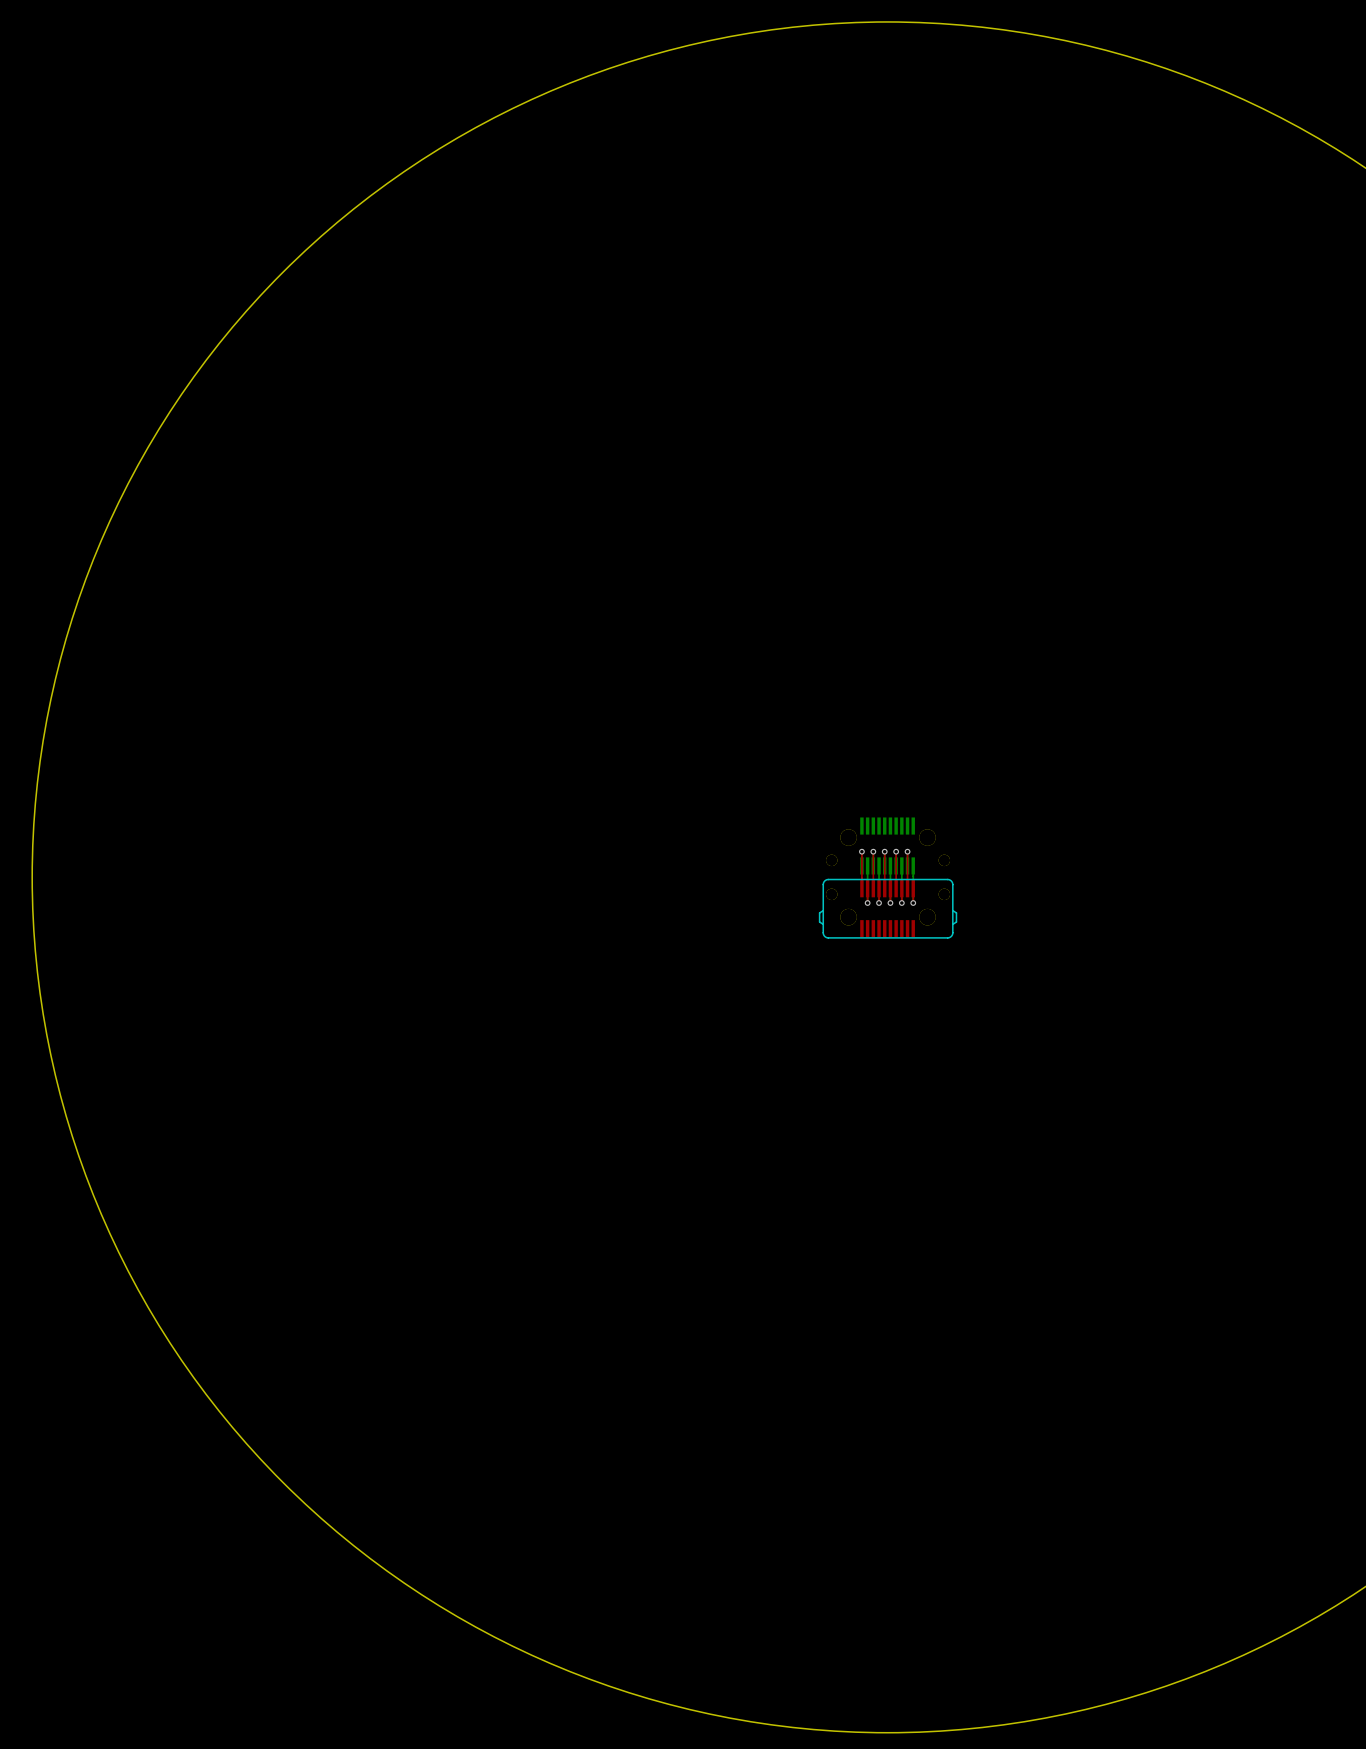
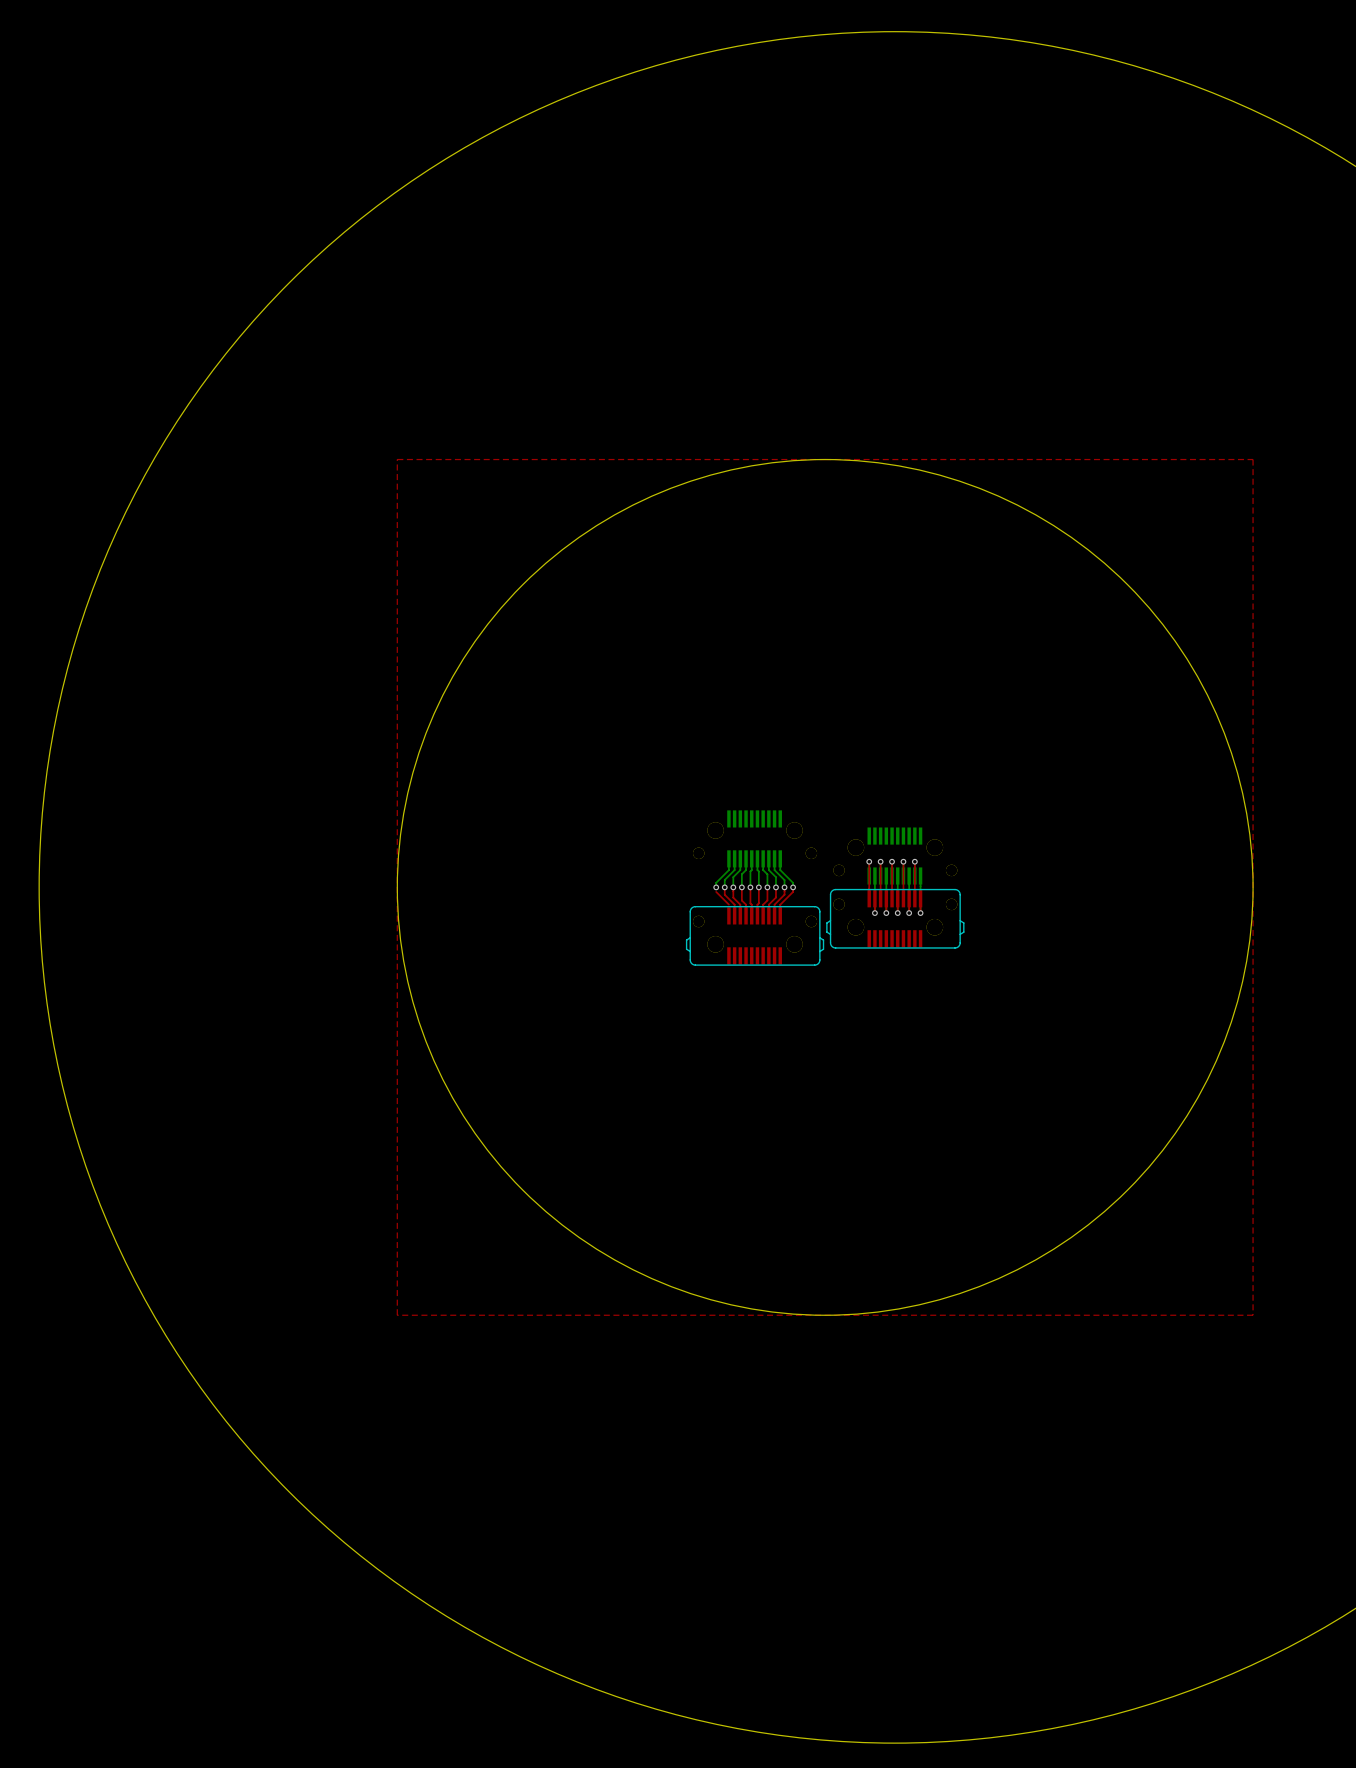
round board edge: none -> [397, 459, 1254, 1316]
top zone outline: none -> (397, 459) (1253, 459) (1253, 1315) (397, 1315) (397, 459)
part: none -> (755, 838)
bottom track: none -> (728, 858) (728, 870) (716, 882) (716, 887)
bottom track: none -> (734, 858) (734, 870) (724, 879) (724, 887)
bottom track: none -> (740, 858) (740, 870) (733, 877) (733, 887)
bottom track: none -> (746, 858) (746, 870) (741, 874) (741, 887)
bottom track: none -> (751, 858) (750, 887)
bottom track: none -> (757, 858) (758, 887)
bottom track: none -> (763, 858) (763, 870) (767, 874) (767, 887)
bottom track: none -> (768, 858) (768, 870) (775, 877) (775, 887)
bottom track: none -> (774, 858) (774, 870) (784, 880) (784, 887)
bottom track: none -> (780, 858) (780, 870) (793, 882) (793, 887)
via: none -> (716, 887)
top track: none -> (724, 887) (724, 894) (734, 904) (734, 915)
via: none -> (724, 887)
top track: none -> (733, 887) (733, 897) (740, 904) (740, 915)
via: none -> (733, 887)
top track: none -> (741, 887) (741, 900) (746, 904) (746, 915)
via: none -> (741, 887)
top track: none -> (750, 887) (751, 915)
via: none -> (750, 887)
top track: none -> (758, 887) (757, 915)
via: none -> (758, 887)
top track: none -> (767, 887) (767, 900) (763, 904) (763, 915)
via: none -> (767, 887)
top track: none -> (775, 887) (775, 897) (768, 904) (768, 915)
via: none -> (775, 887)
top track: none -> (784, 887) (784, 894) (774, 904) (774, 915)
via: none -> (784, 887)
top track: none -> (793, 887) (793, 891) (780, 904) (780, 915)
via: none -> (793, 887)
top track: none -> (716, 891) (728, 904)
part: none -> (755, 935)

